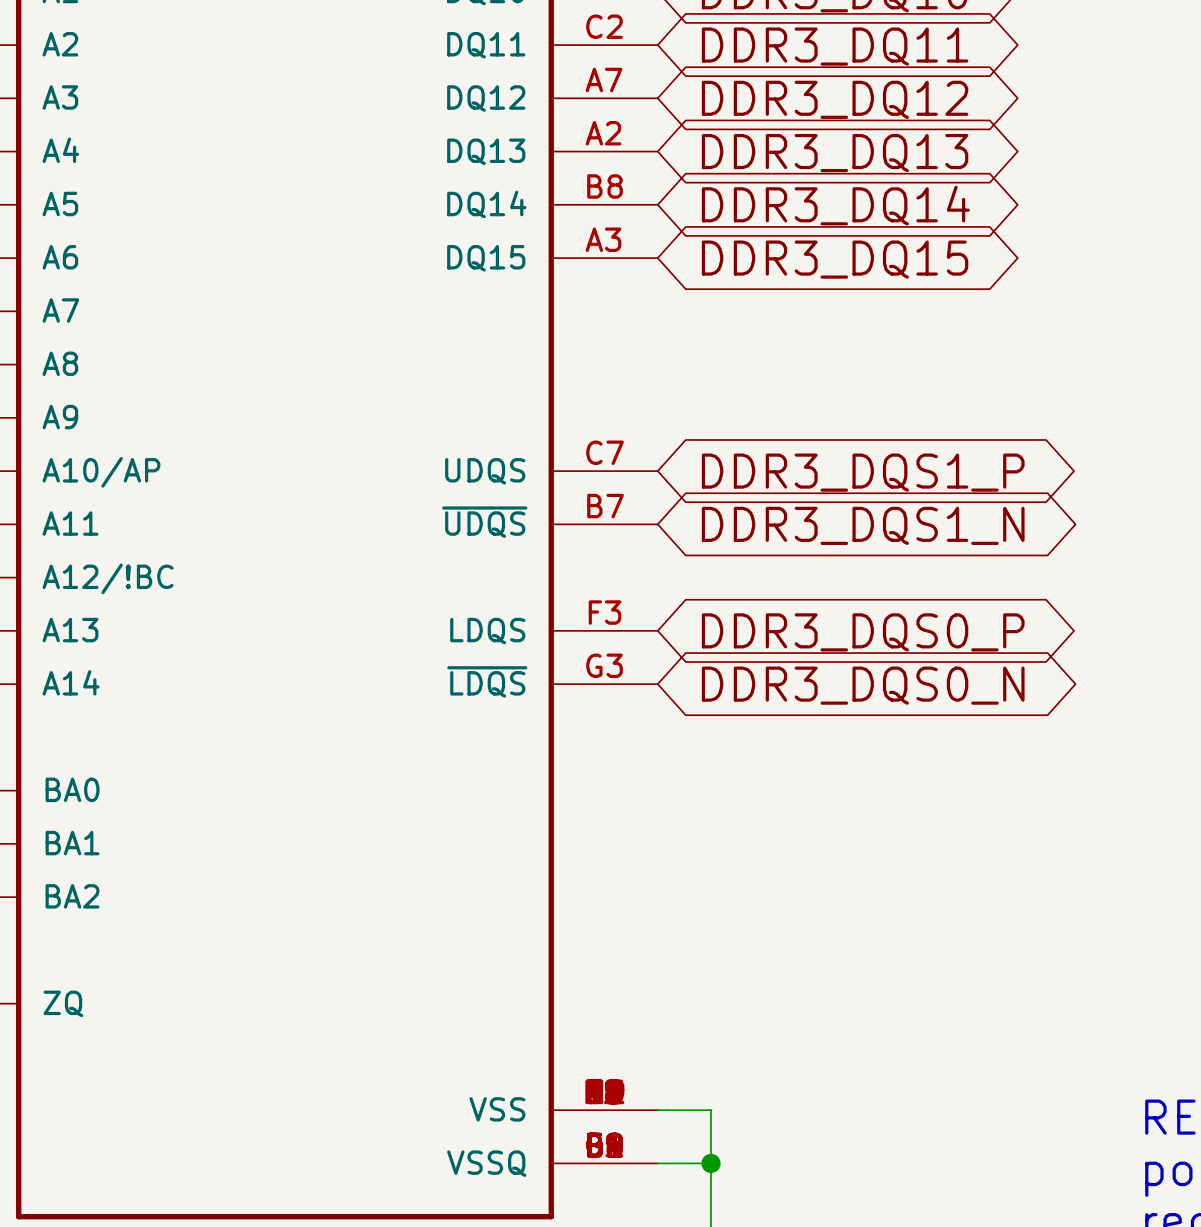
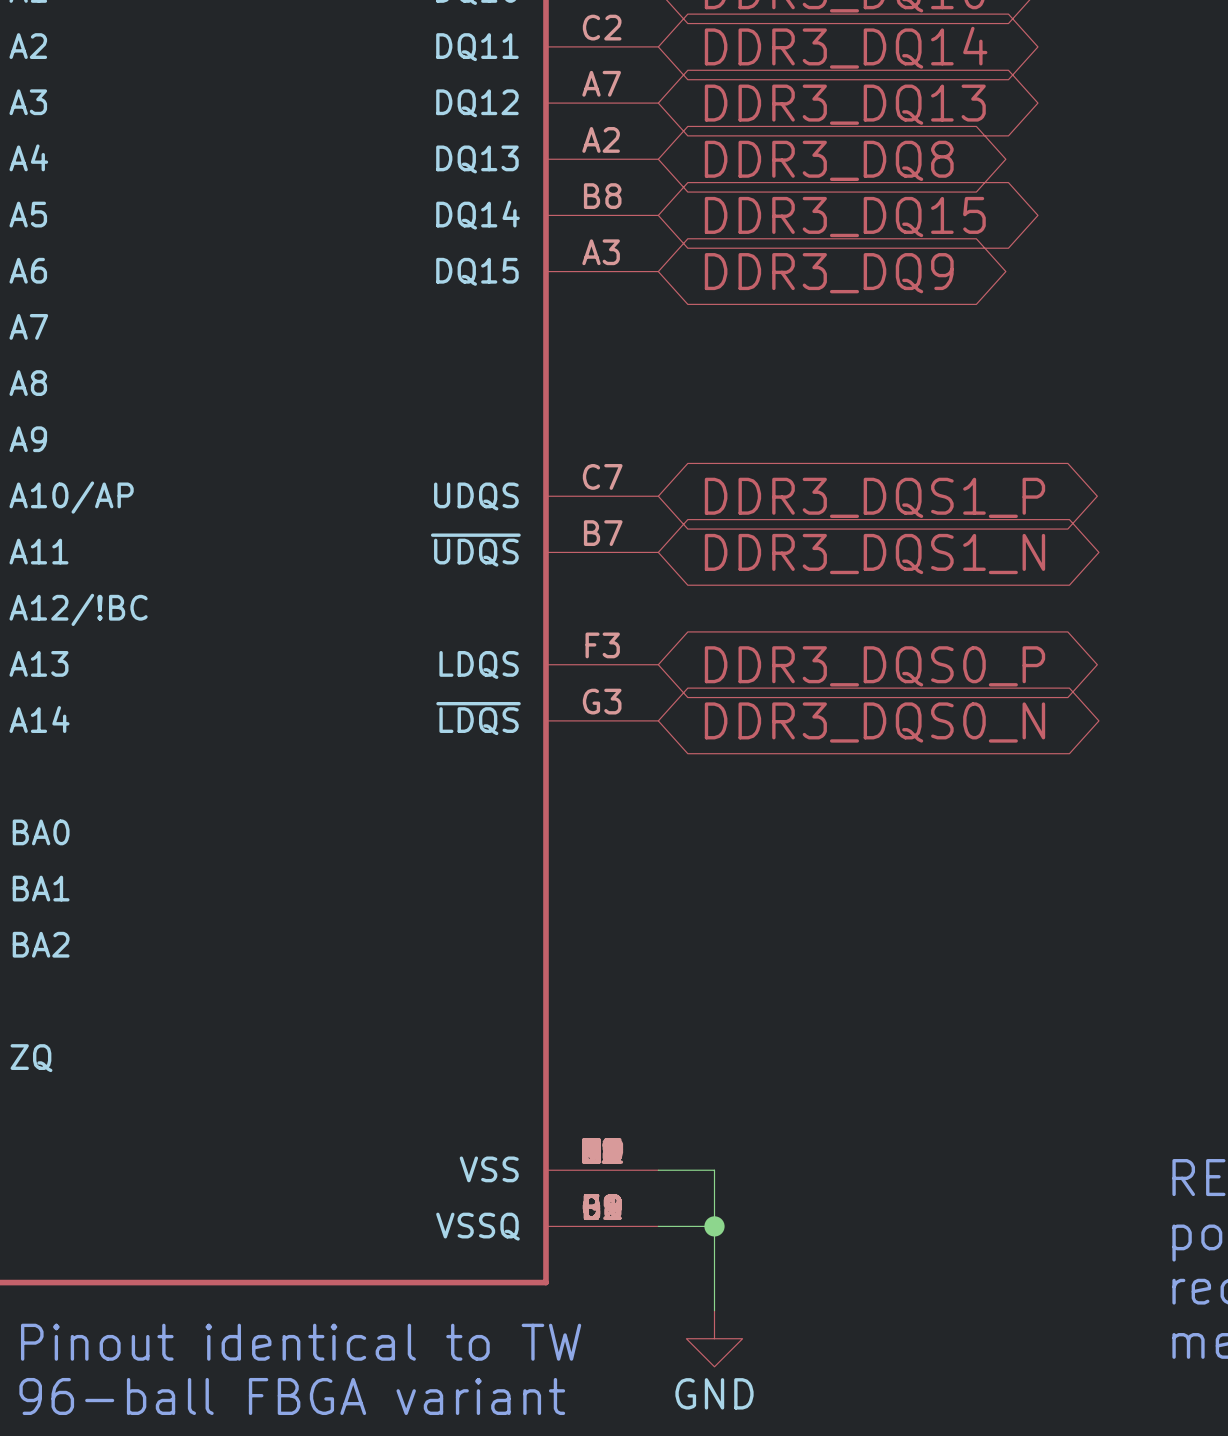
global label: DDR3_DQ11 (835, 46) -> DDR3_DQ14 (846, 47)
global label: DDR3_DQ12 (835, 99) -> DDR3_DQ13 (845, 104)
global label: DDR3_DQ13 (835, 153) -> DDR3_DQ8 (829, 160)
global label: DDR3_DQ14 (835, 205) -> DDR3_DQ15 (845, 217)
global label: DDR3_DQ15 (835, 259) -> DDR3_DQ9 (829, 273)

